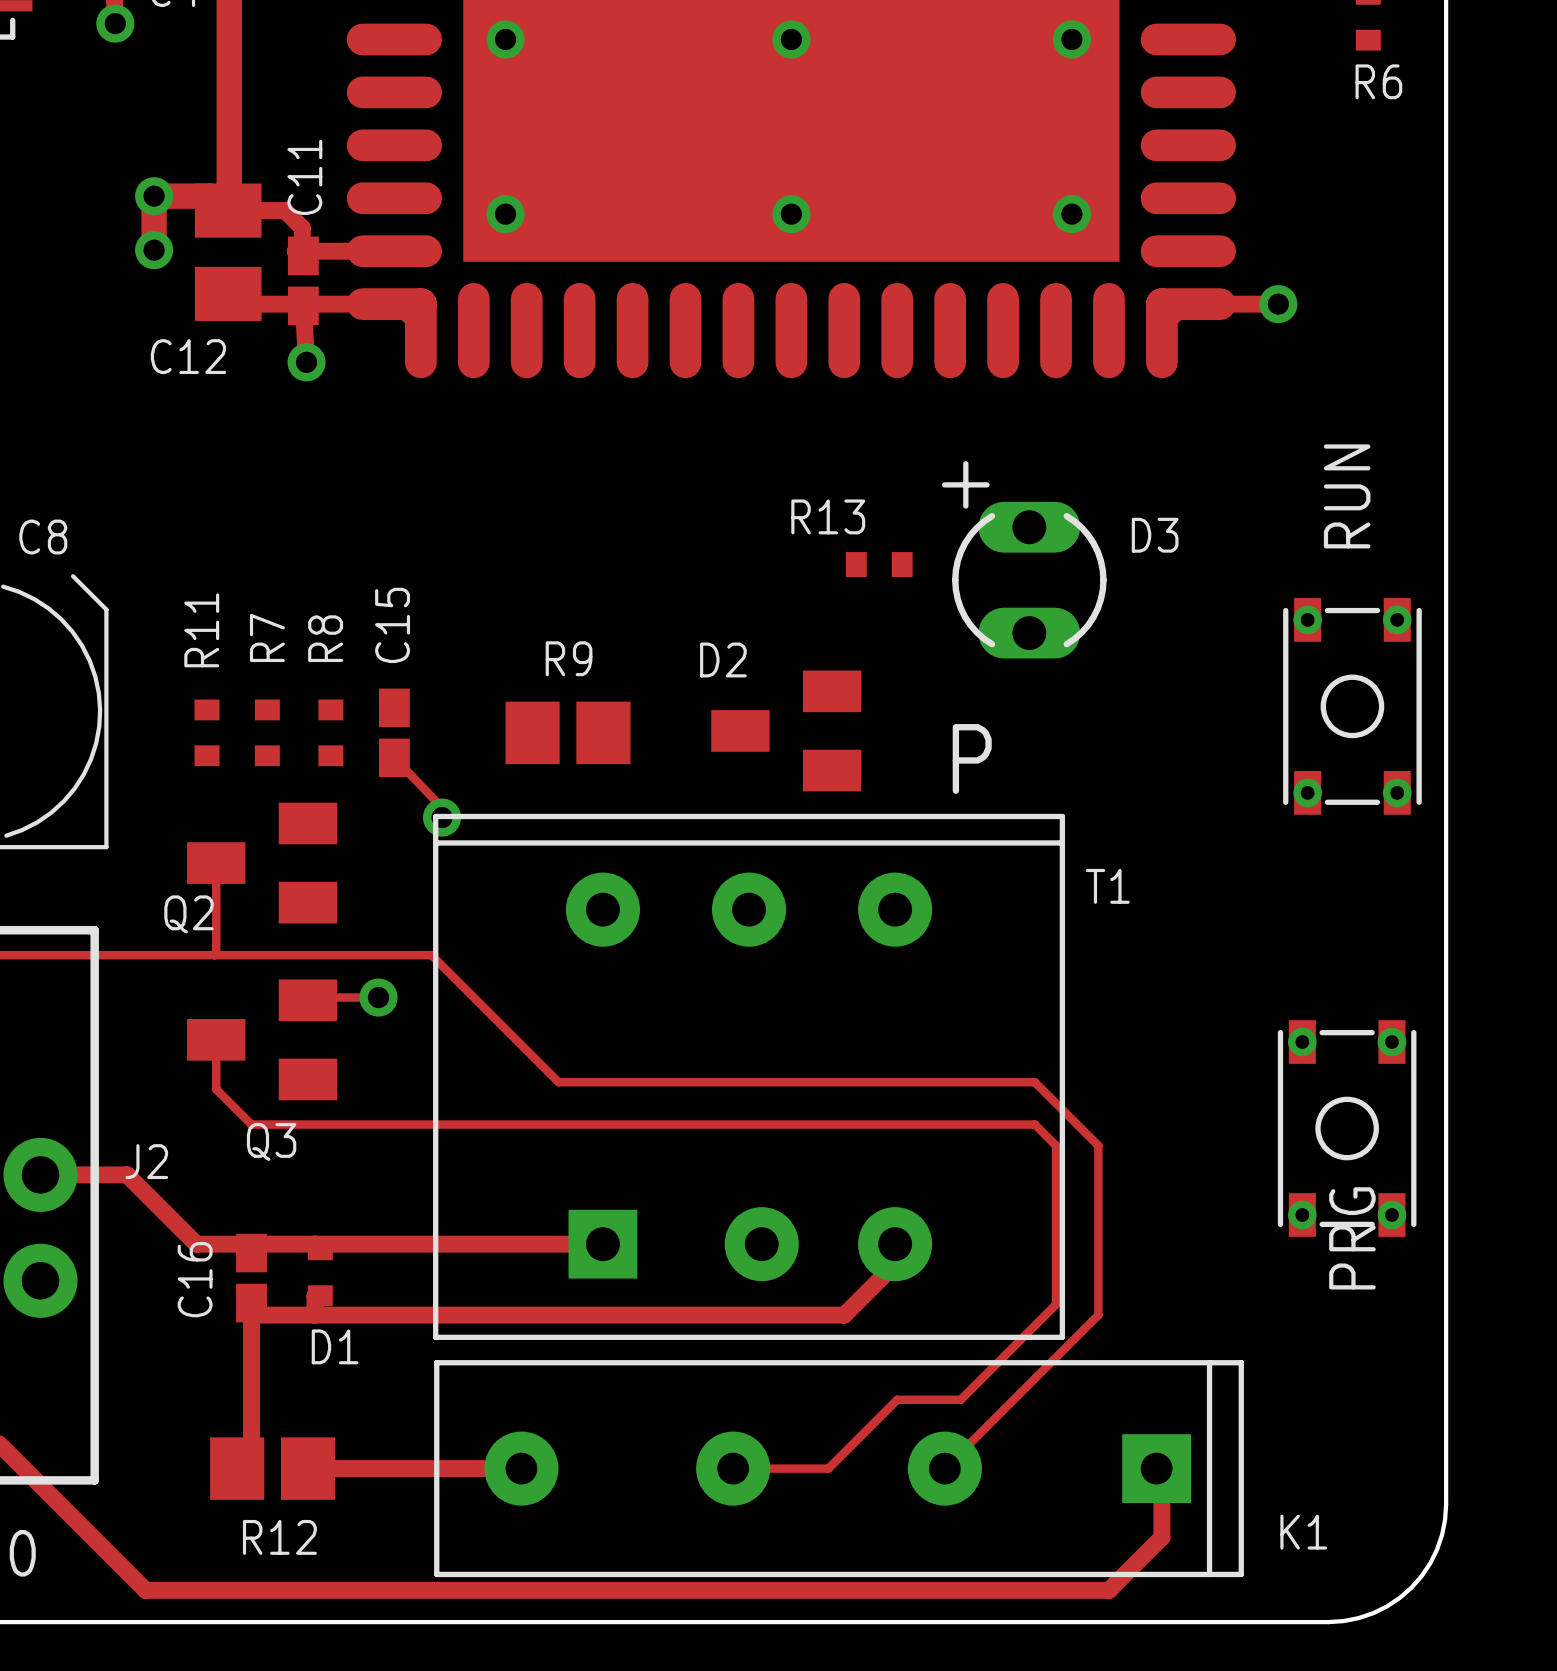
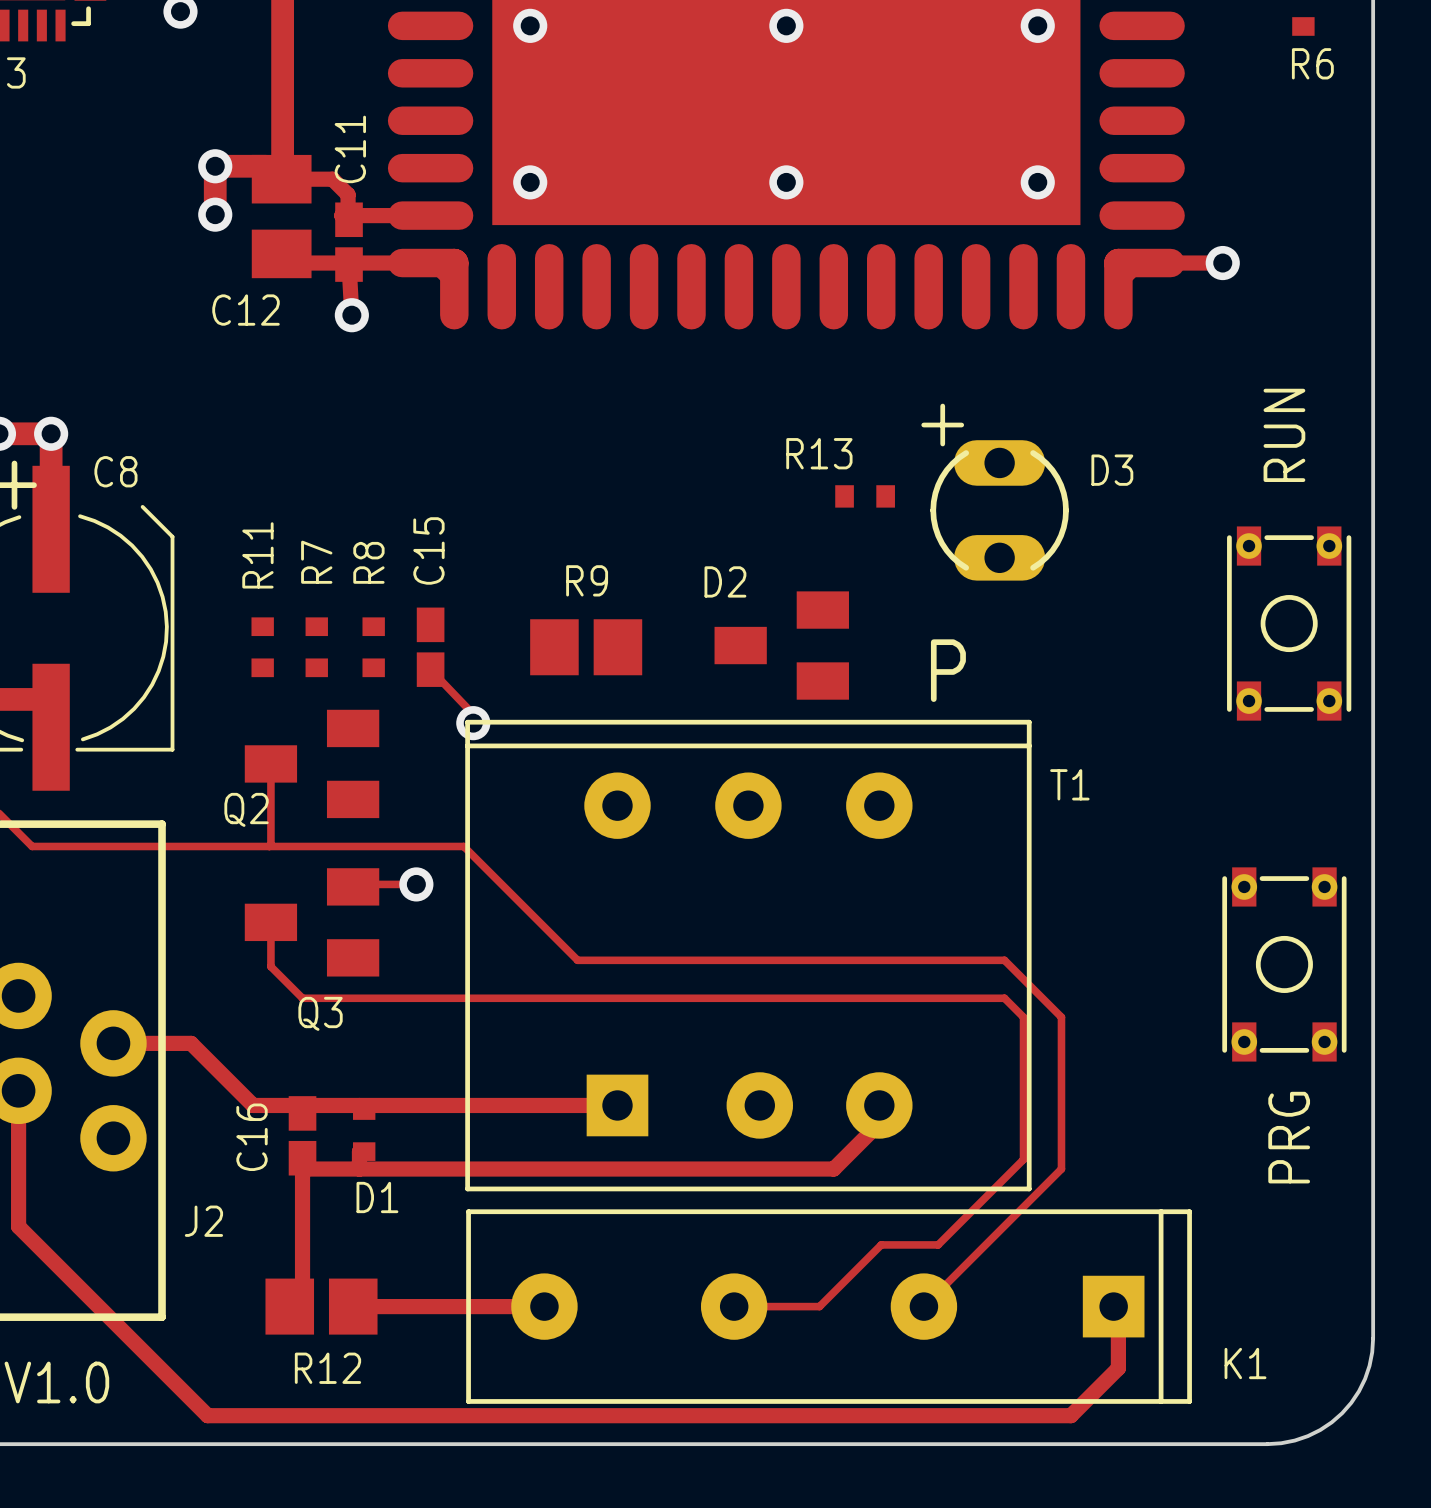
part position: (1347, 1128) -> (1284, 964)
J2 name position: J2 (146, 1161) -> J2 (203, 1221)
text position: PRG (1352, 1238) -> PRG (1289, 1137)

